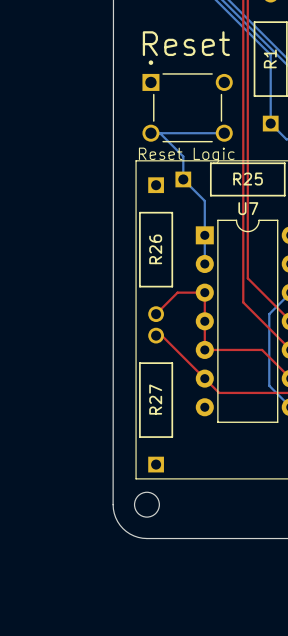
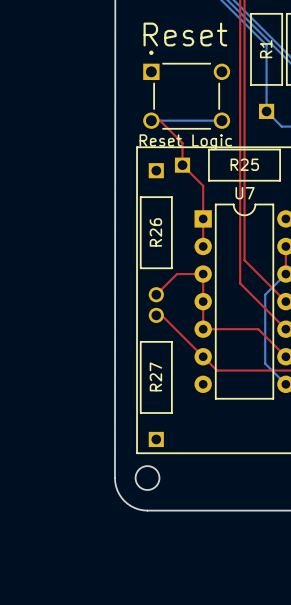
top track: none -> (151, 120) (160, 120) (182, 143) (182, 165) (203, 185) (203, 246)
bottom track: (159, 133) (183, 156) (183, 179) (204, 200) (204, 263) -> none

